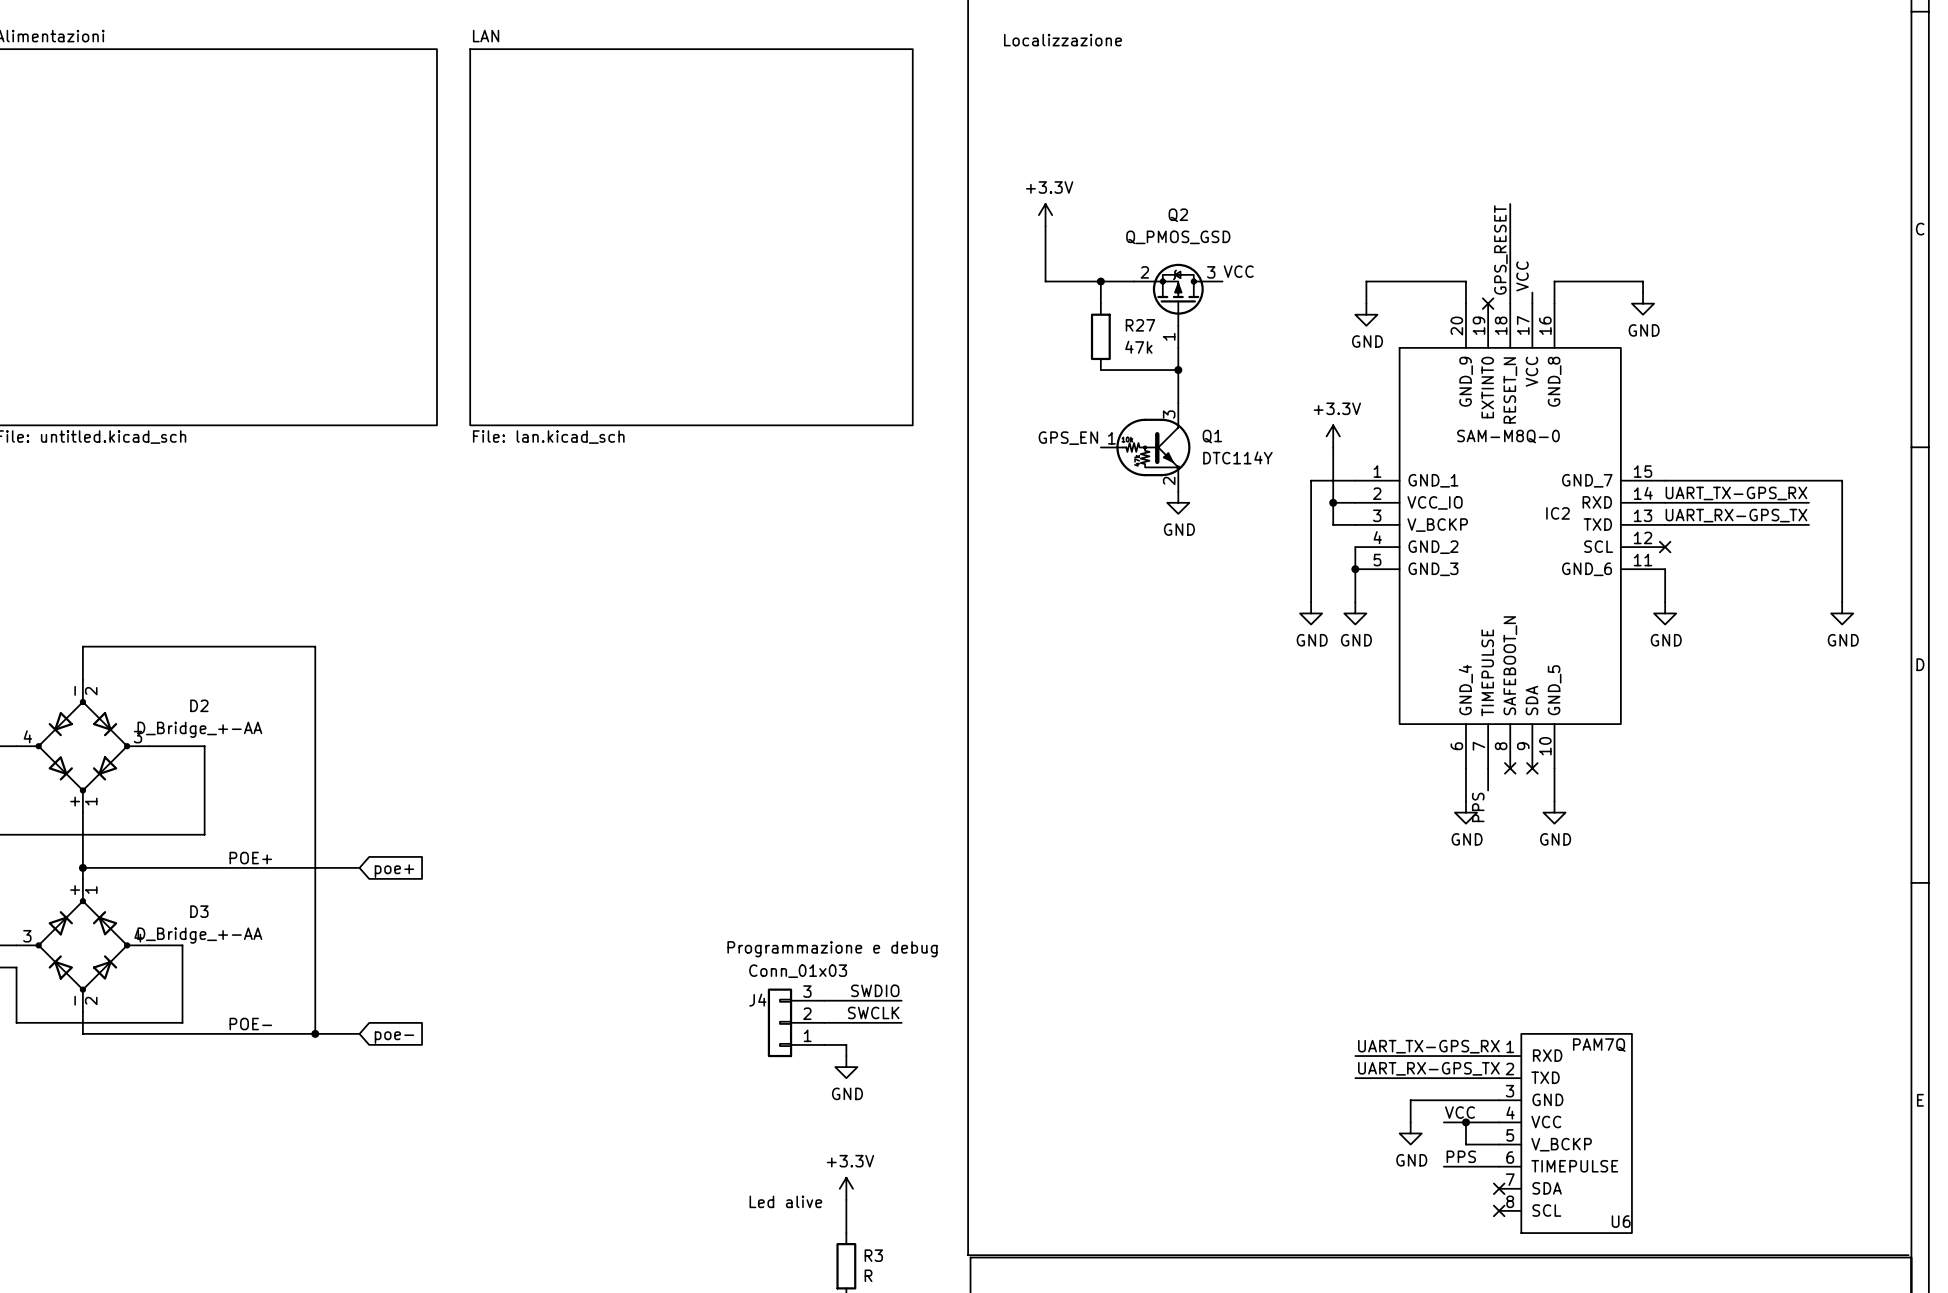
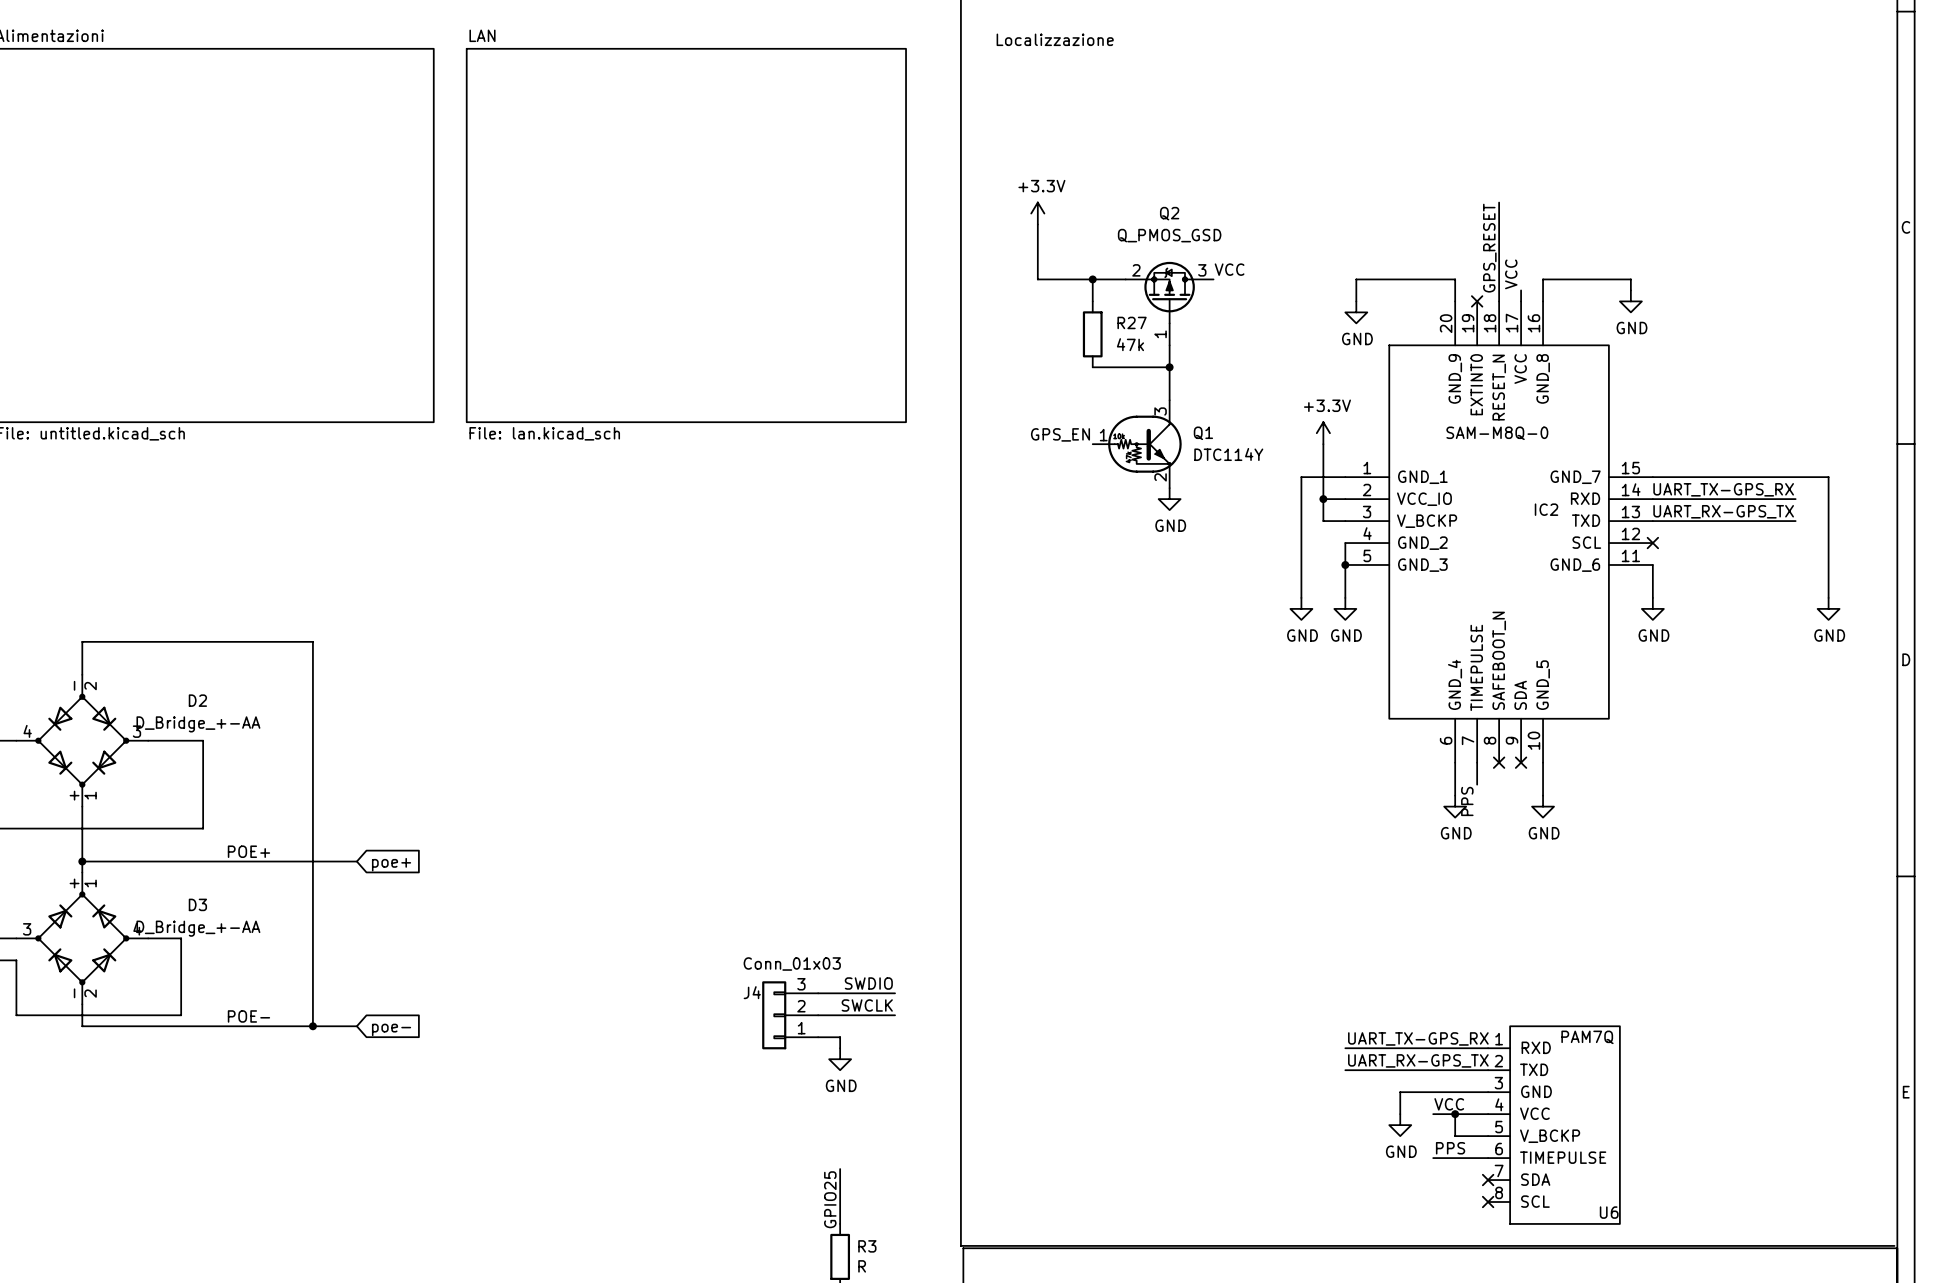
text: Programmazione e debug (832, 949) -> none
power symbol: +3.3V (846, 1188) -> none
text: Led alive (785, 1201) -> none
label: none -> GPIO25 (830, 1199)

